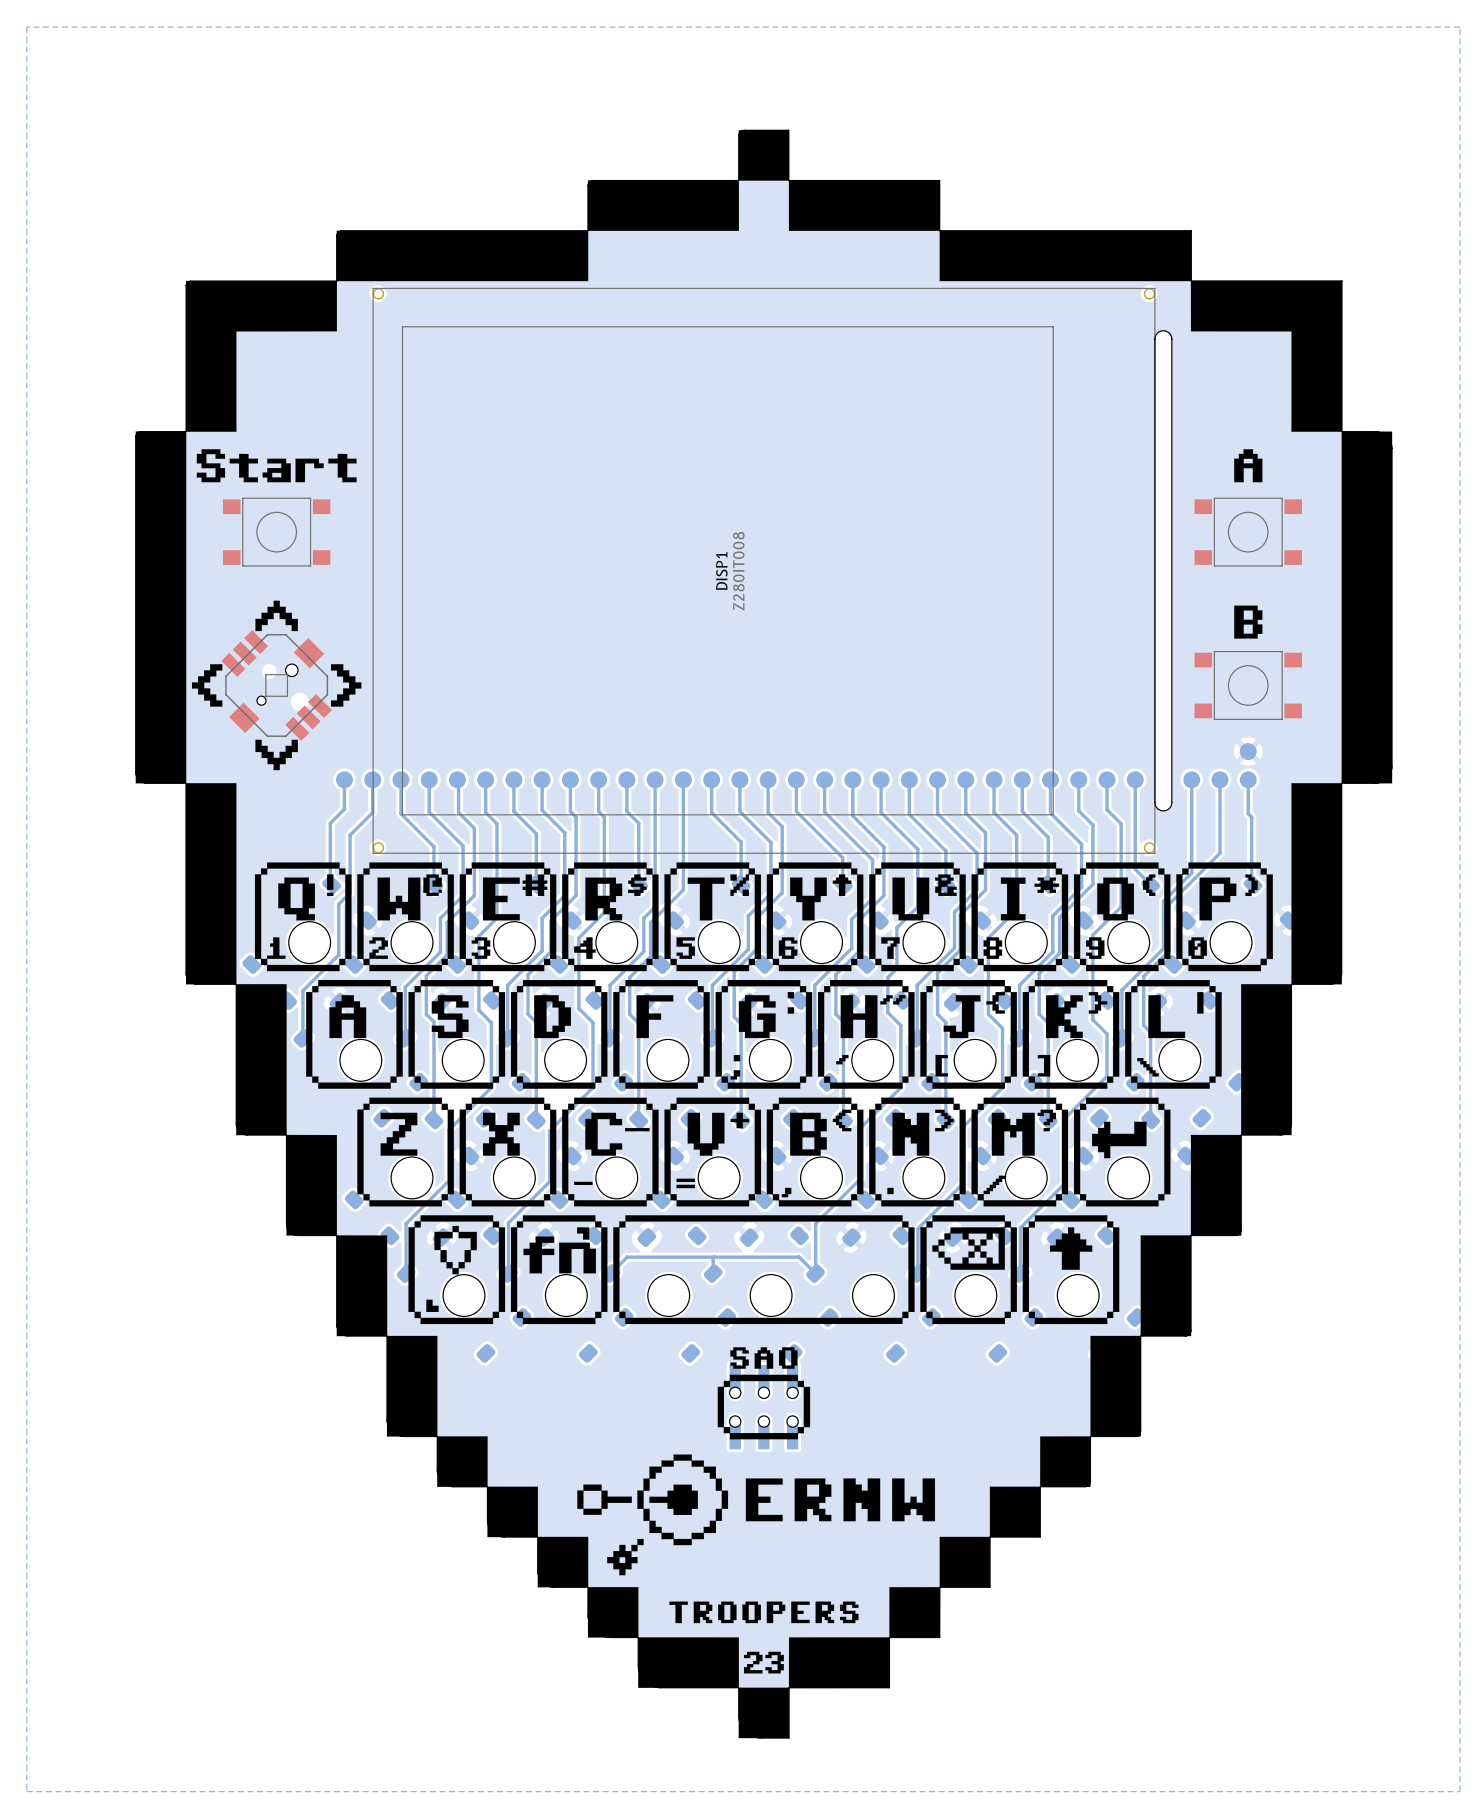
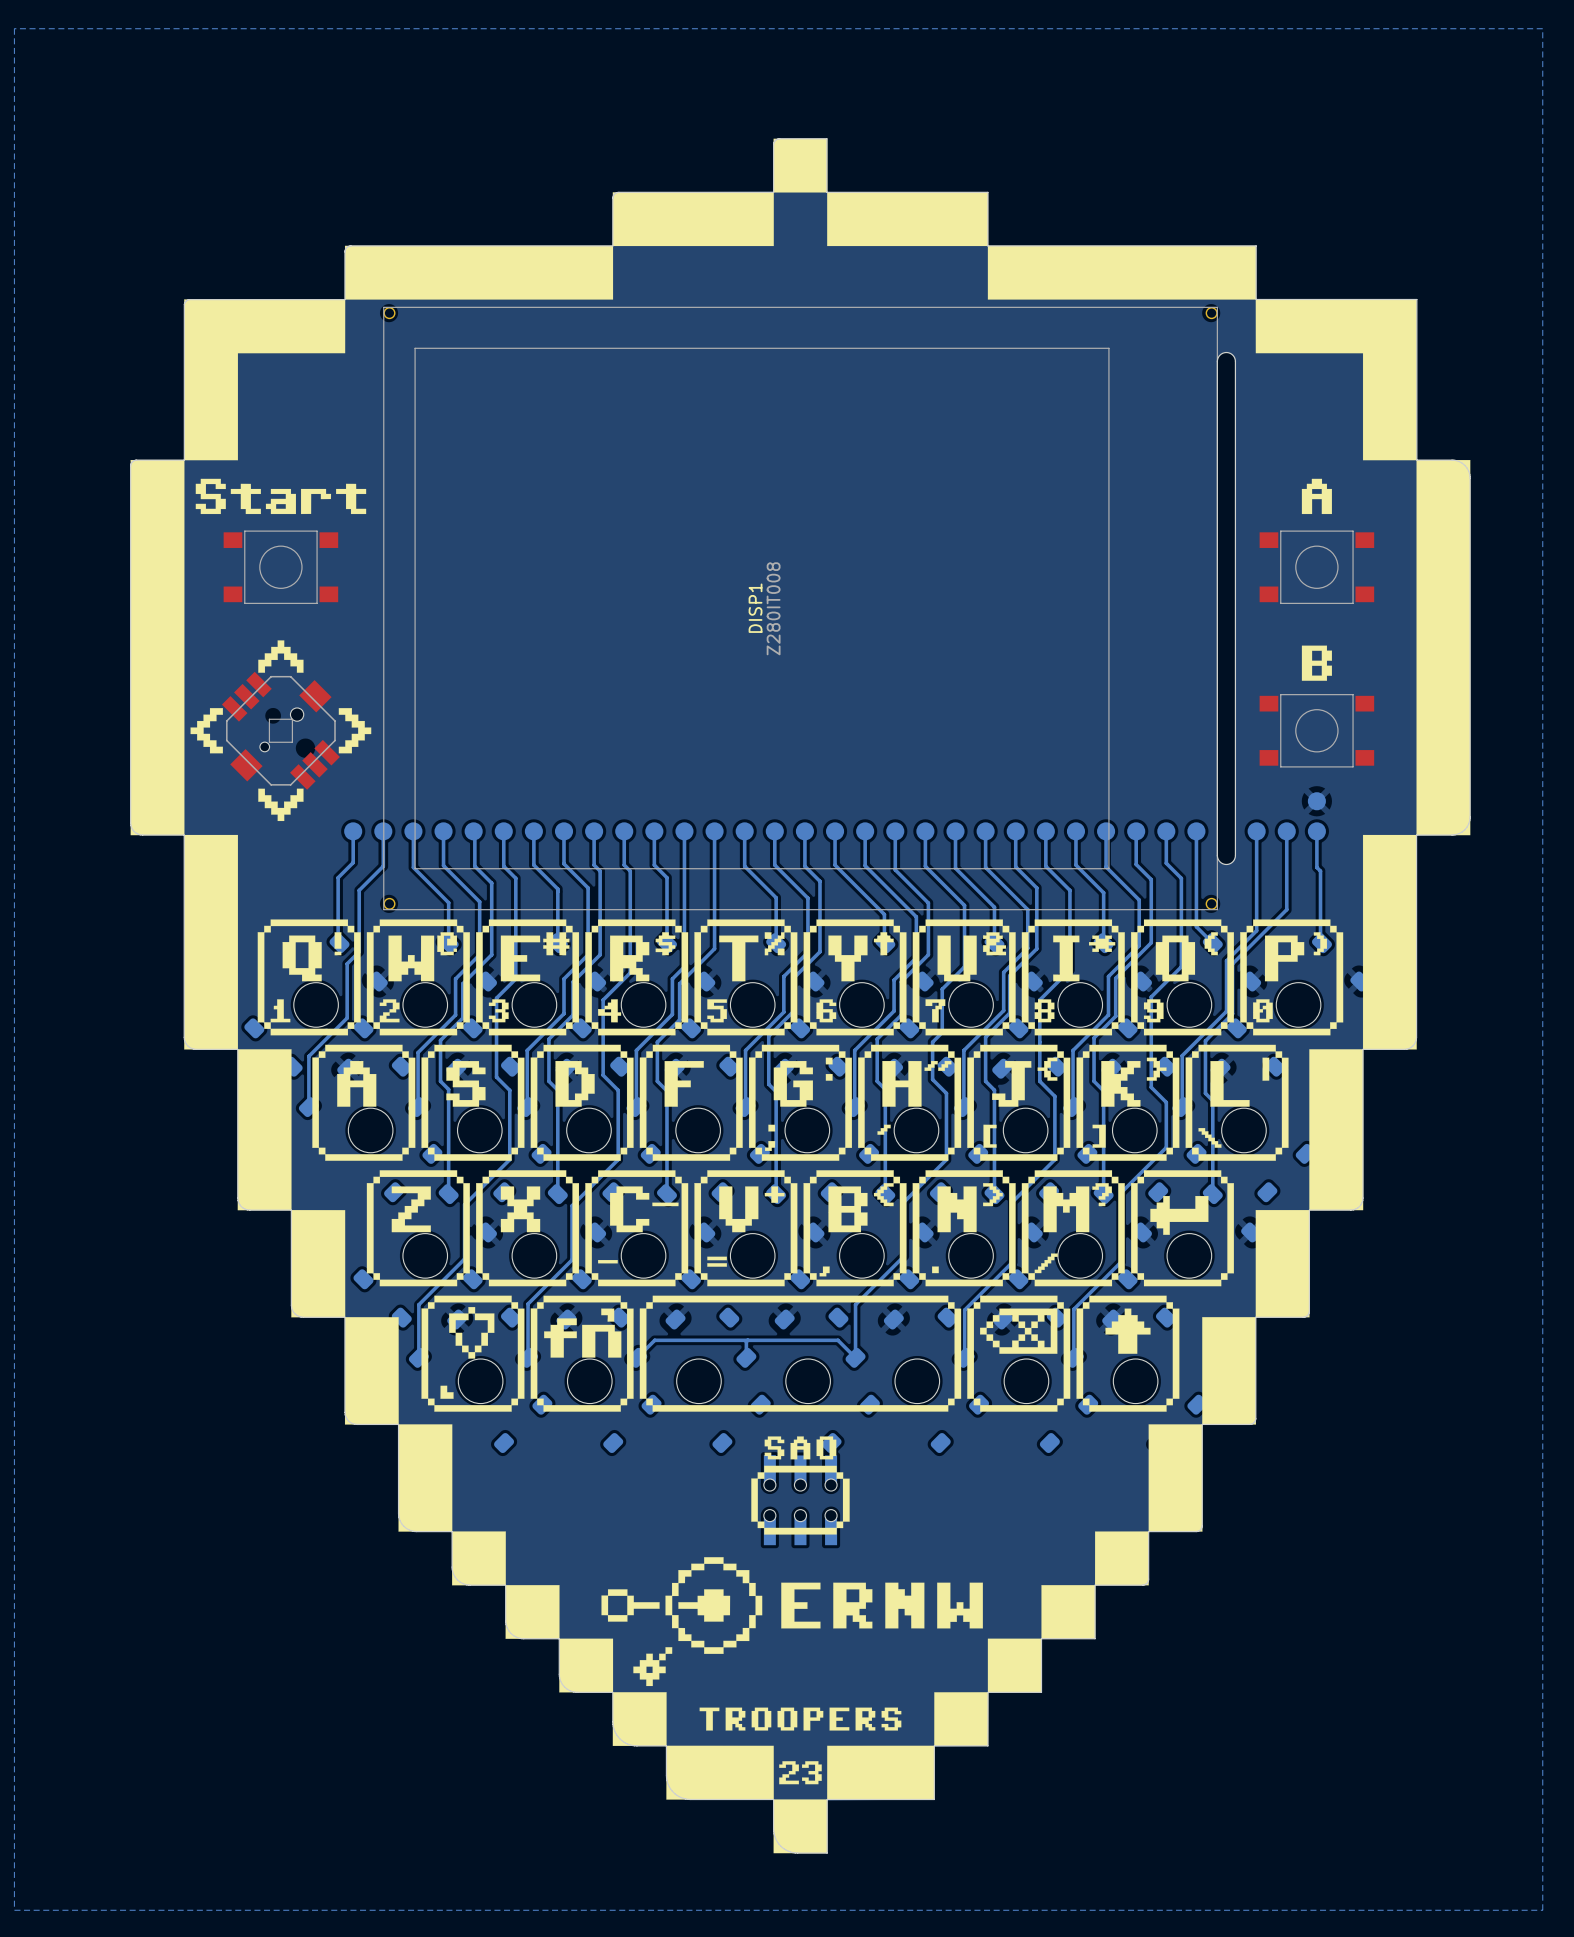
drawing shape: [135, 129, 1393, 1739] -> [130, 138, 1471, 1854]

